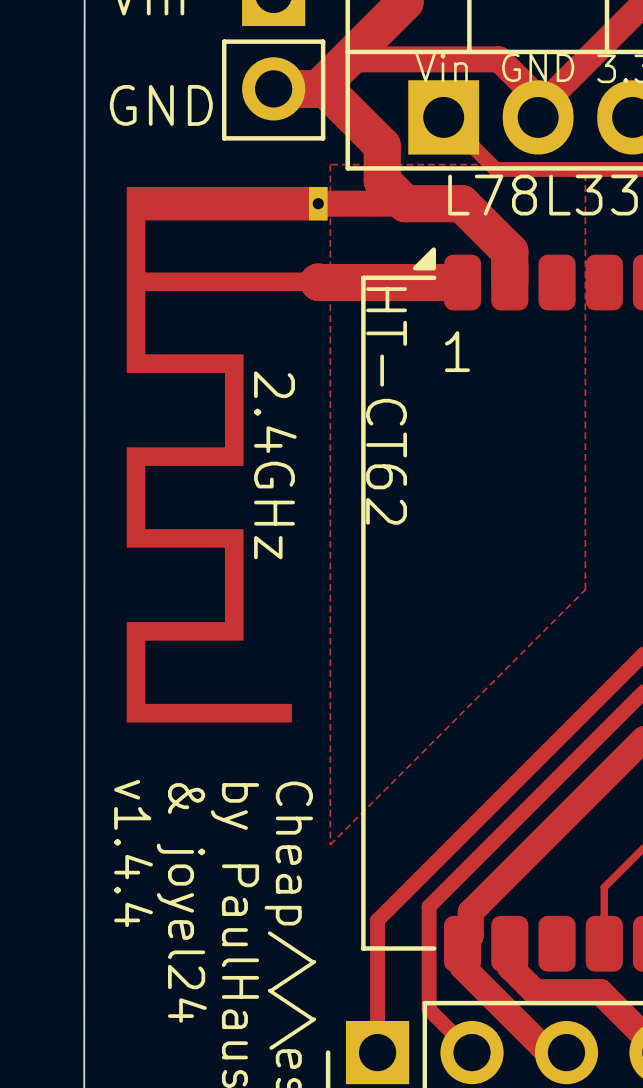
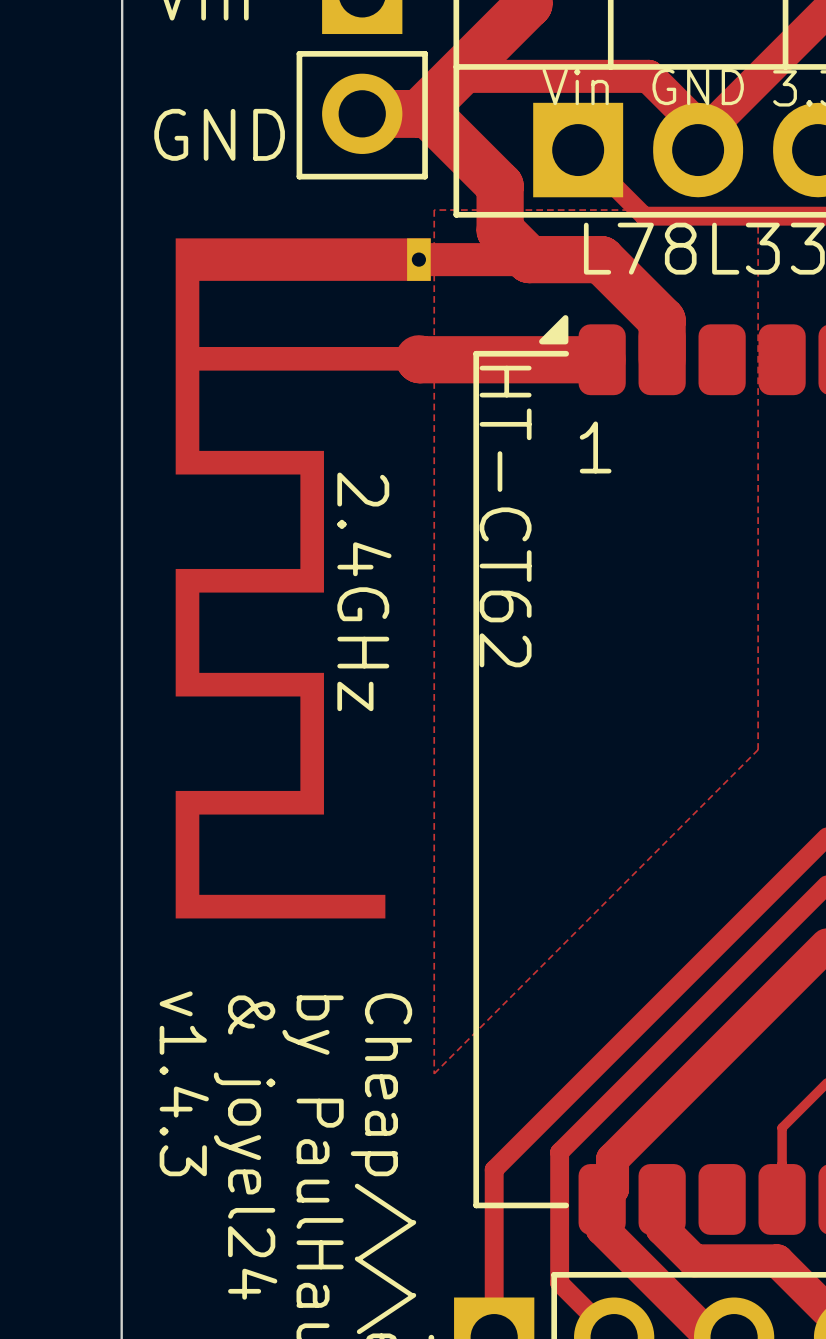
text: v1.4.4 (133, 853) -> v1.4.3 (184, 1083)

